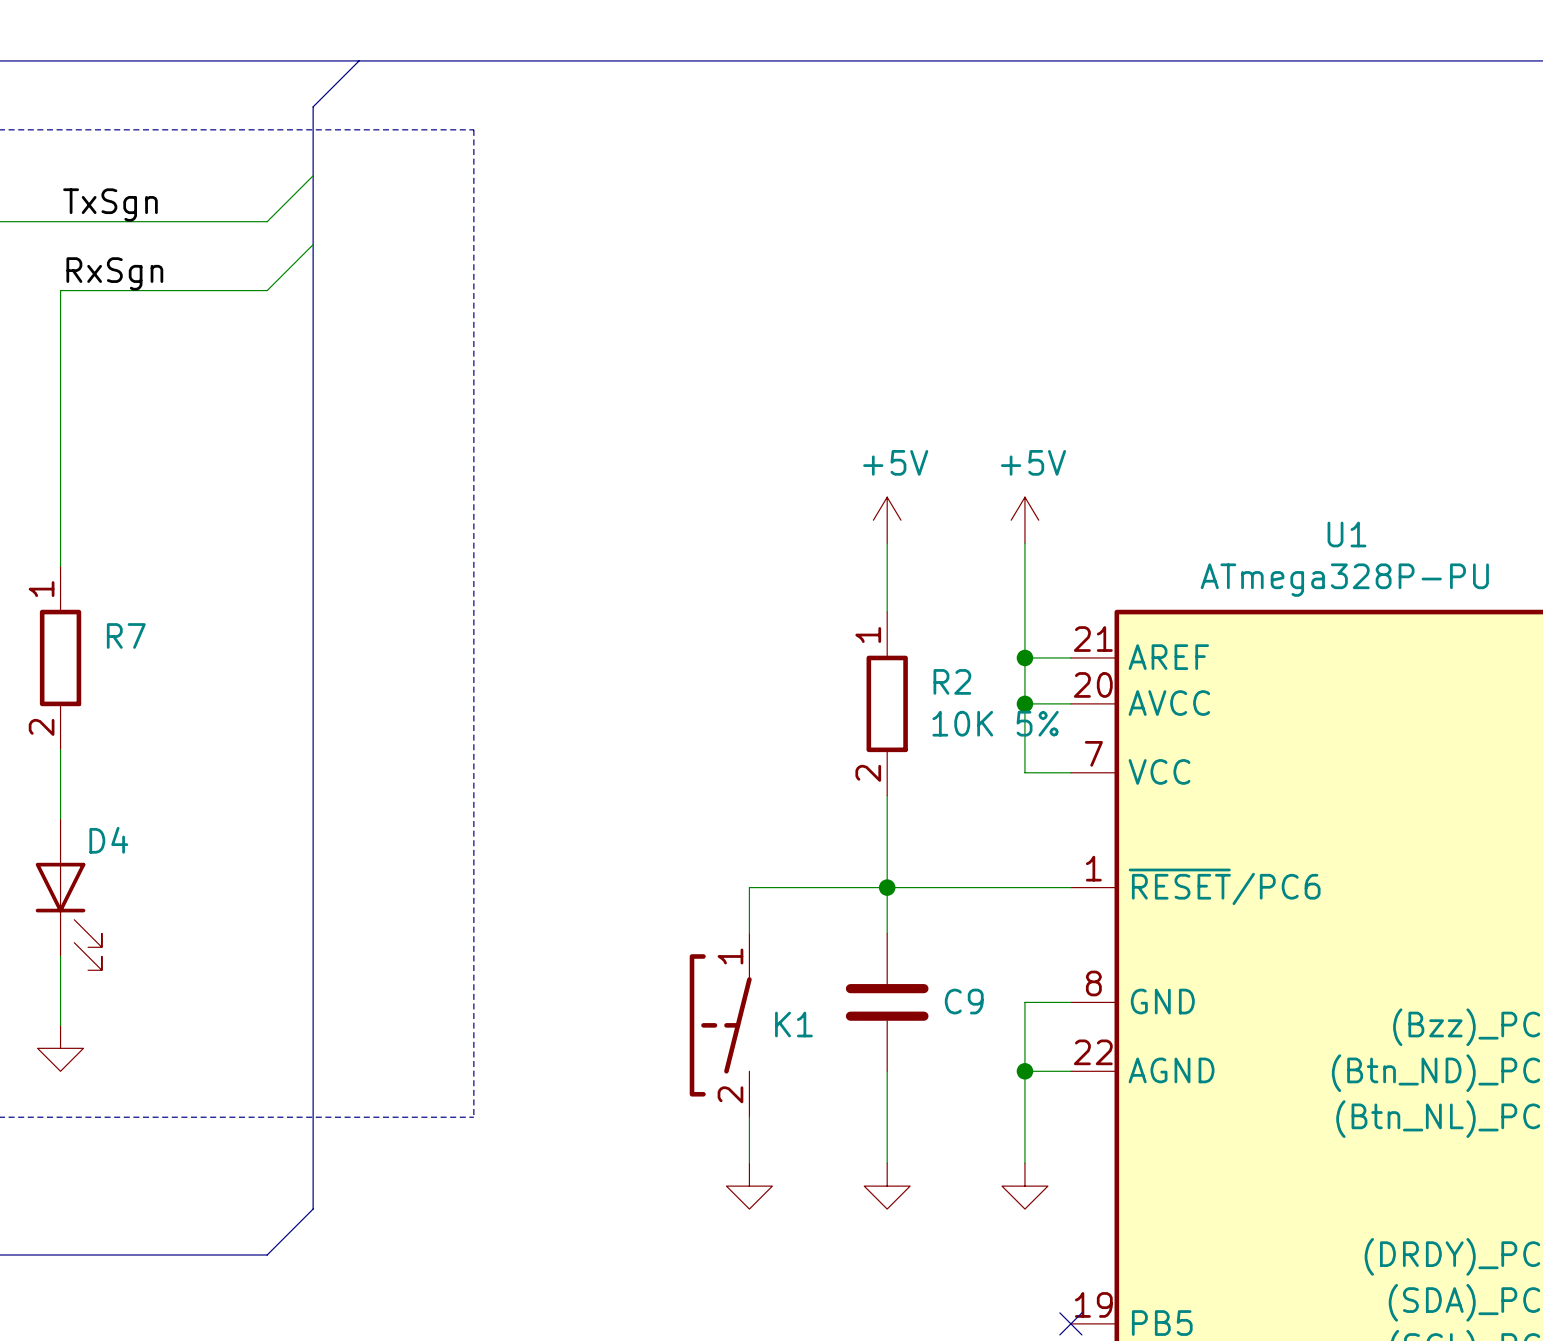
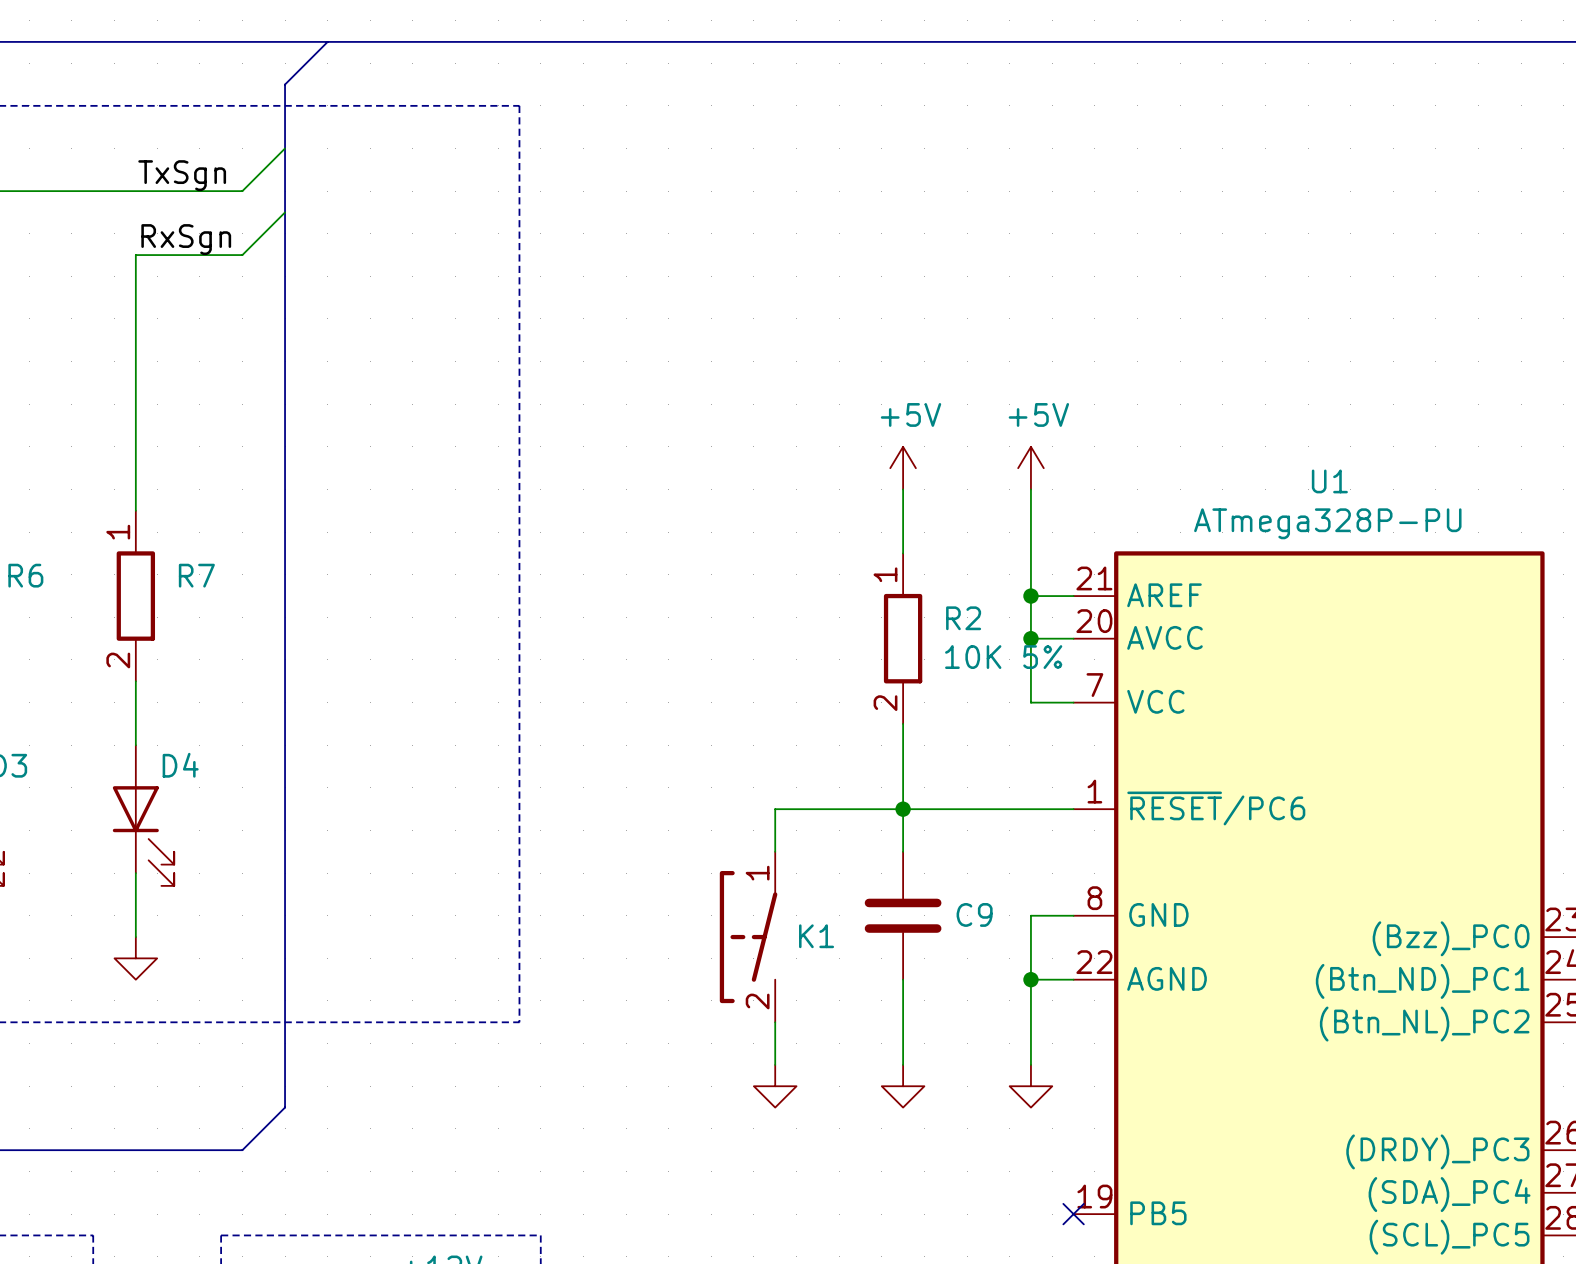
bus: (359, 60) (313, 106) (313, 1209) (267, 1255) (175, 1255) -> (327, 41) (285, 84) (285, 1107) (242, 1150)
wire: (313, 175) (267, 221) (175, 221) -> (285, 148) (242, 191)
wire: (313, 244) (267, 290) (175, 290) -> (285, 212) (242, 255)

